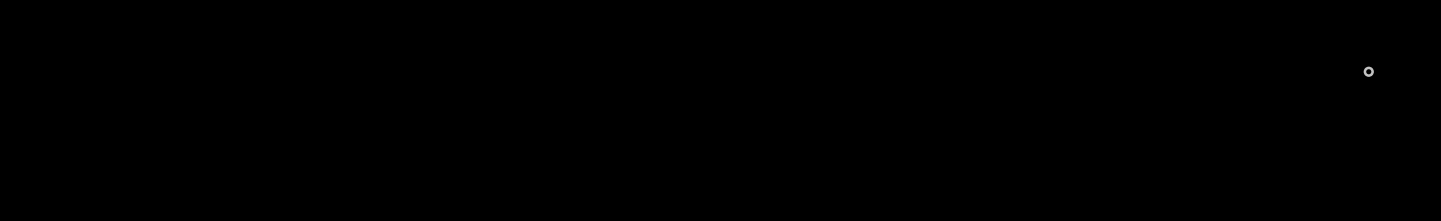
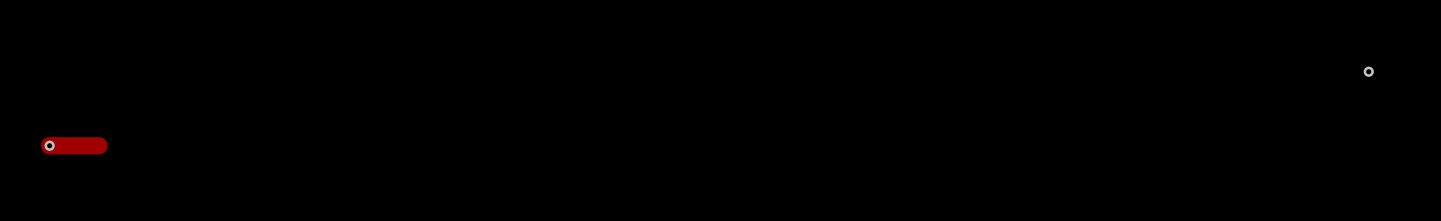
track: none -> (49, 145) (99, 145)
via: none -> (49, 145)

